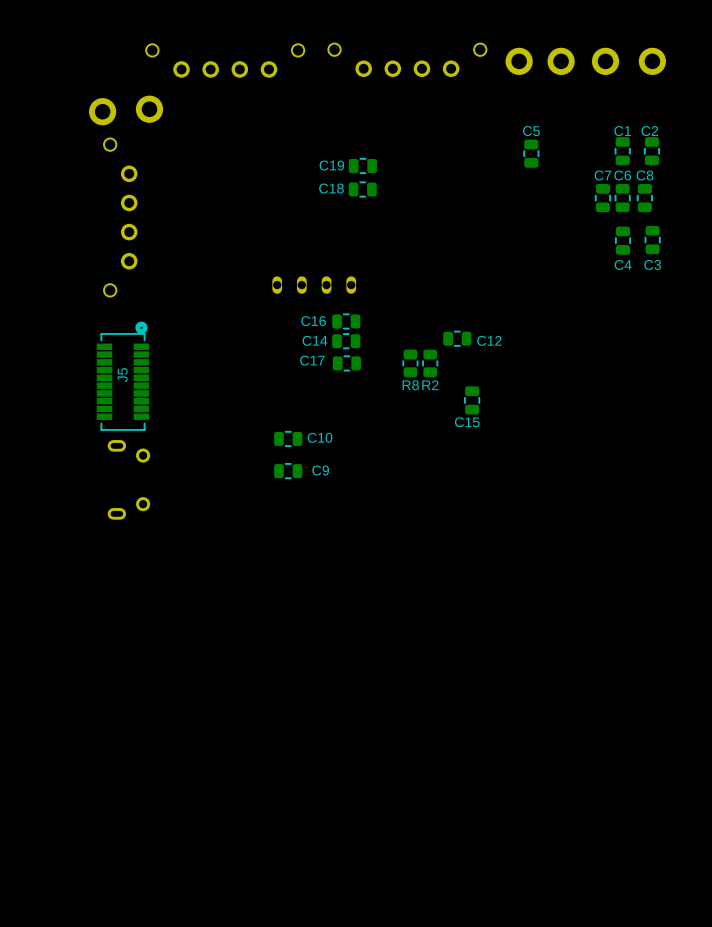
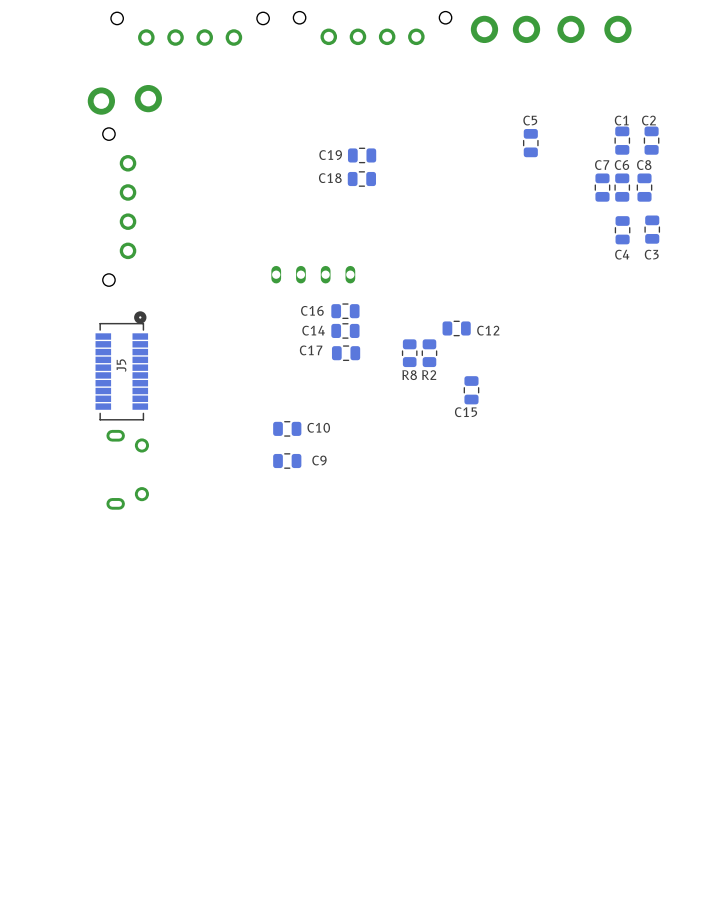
part: none -> (484, 29)
part: none -> (526, 29)
part: none -> (570, 29)
part: none -> (617, 29)
part position: (225, 60) -> (190, 29)
part position: (407, 60) -> (372, 28)
part: (519, 61) -> none
part: (561, 61) -> none
part: (605, 61) -> none
part: (652, 61) -> none

